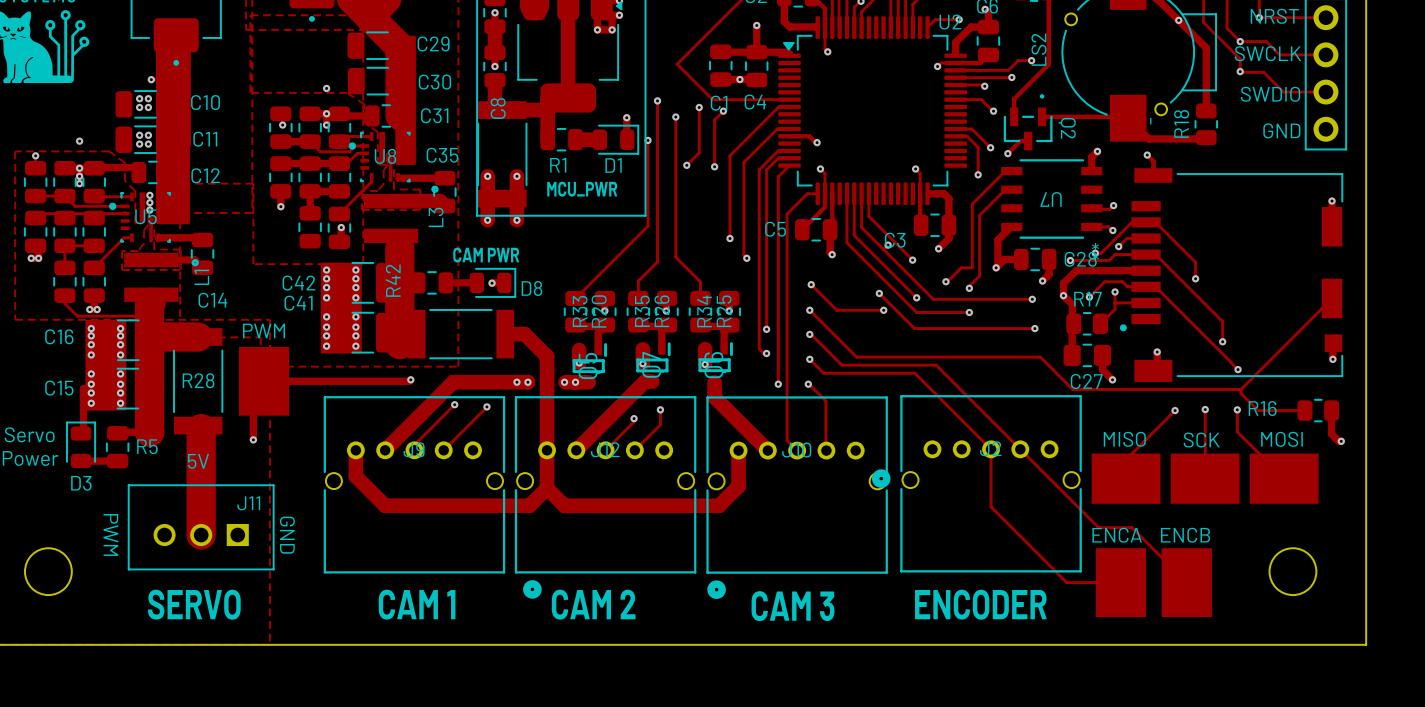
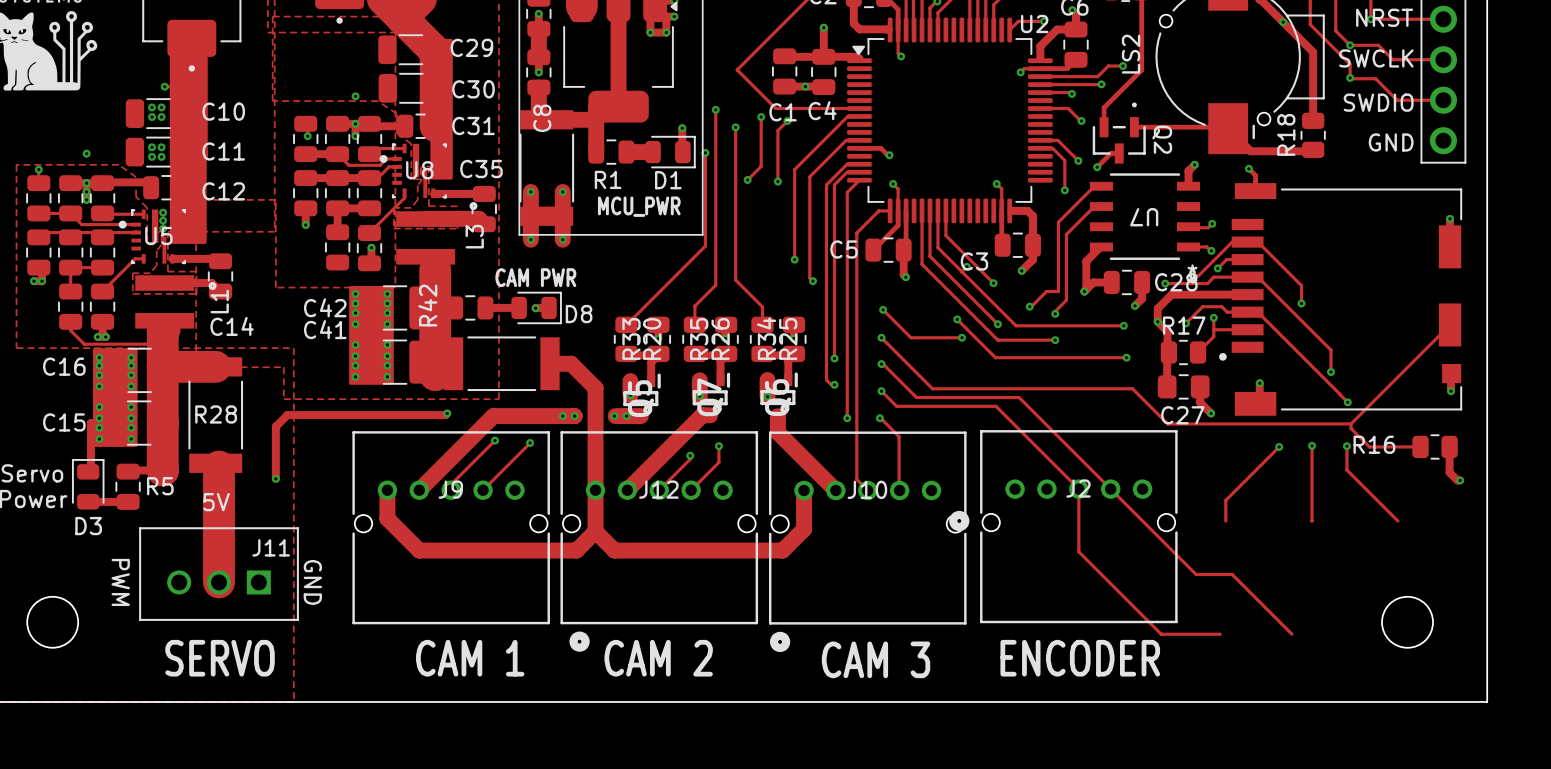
PWM: (264, 381) -> none
MISO: (1126, 478) -> none
SCK: (1205, 478) -> none
MOSI: (1284, 478) -> none
ENCA: (1120, 582) -> none
ENCB: (1186, 582) -> none

